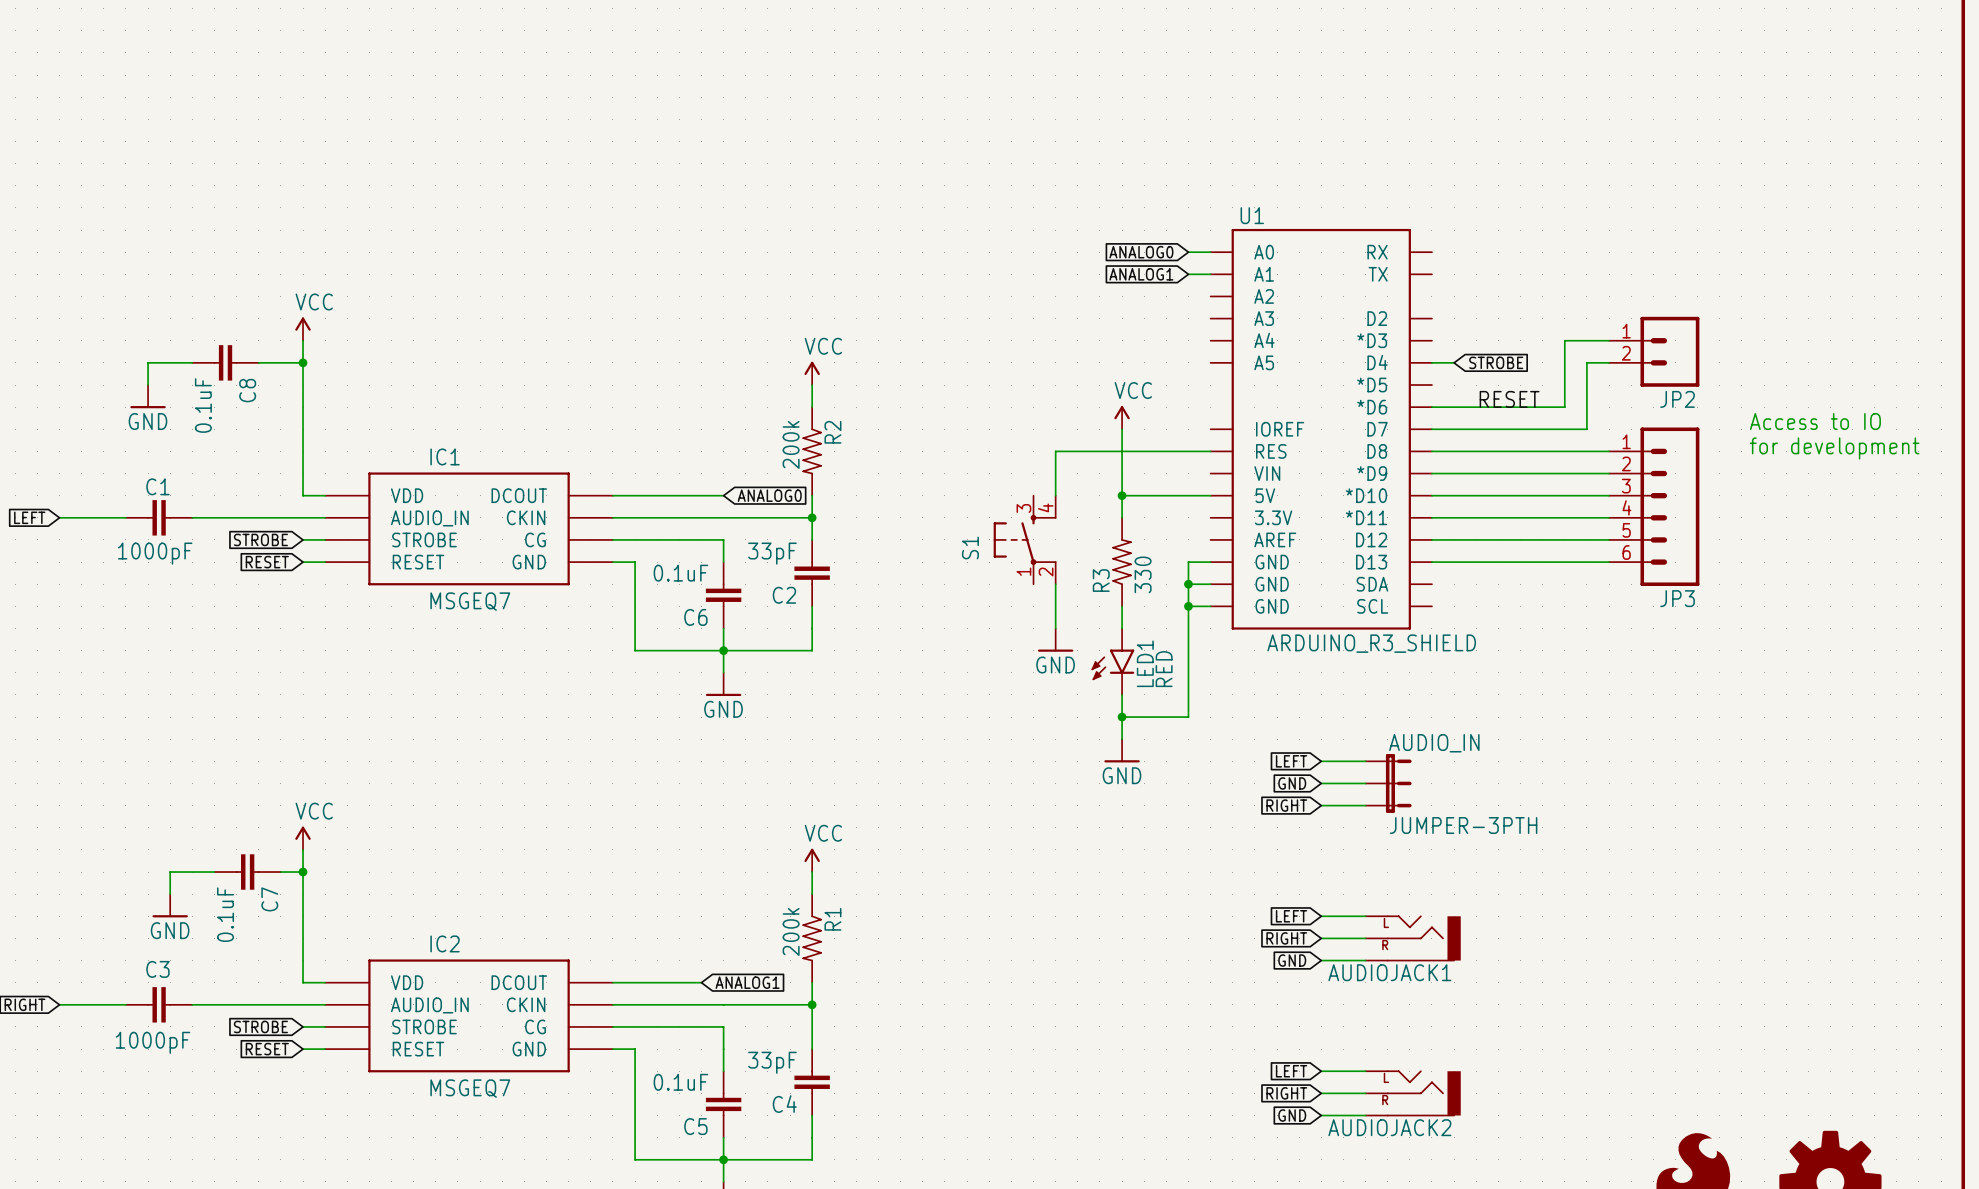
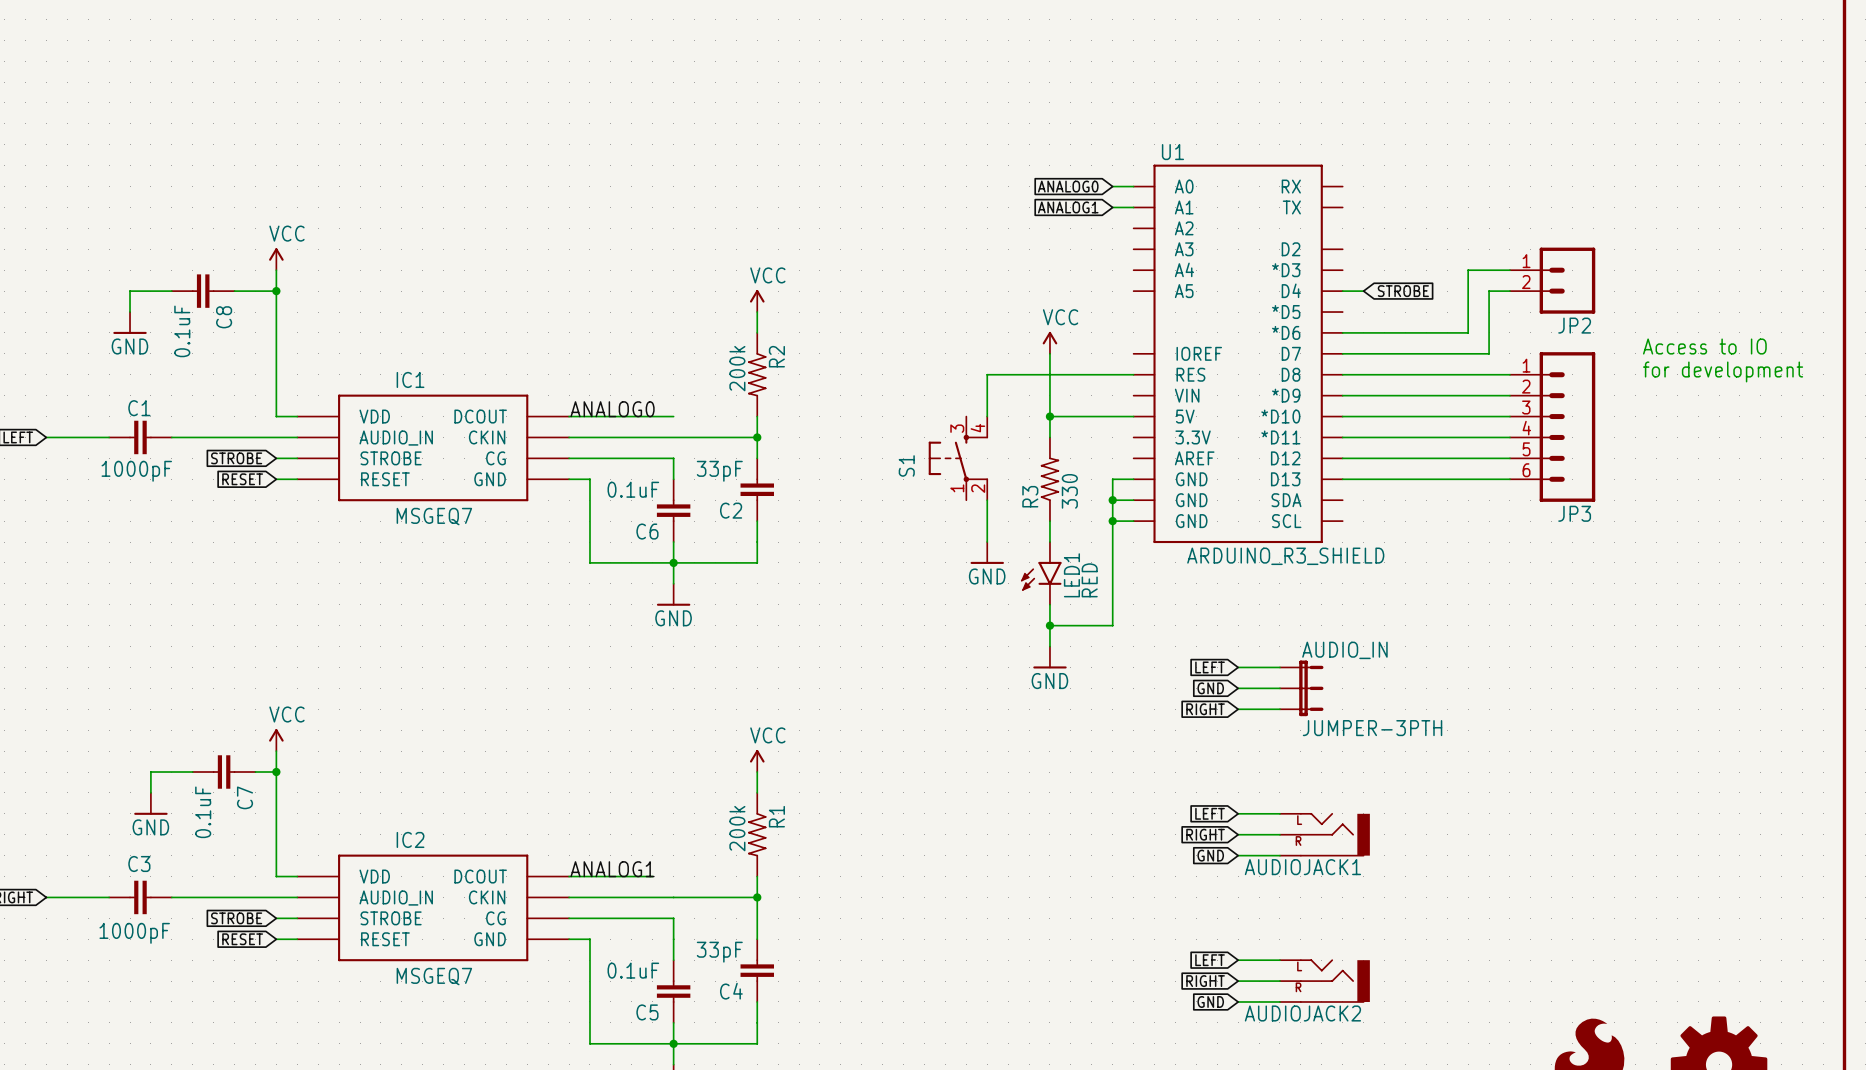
label: RESET (1509, 399) -> none
label: none -> ANALOG0 (612, 409)
global label: ANALOG0 (769, 495) -> none
label: none -> ANALOG1 (612, 869)
global label: ANALOG1 (747, 982) -> none

